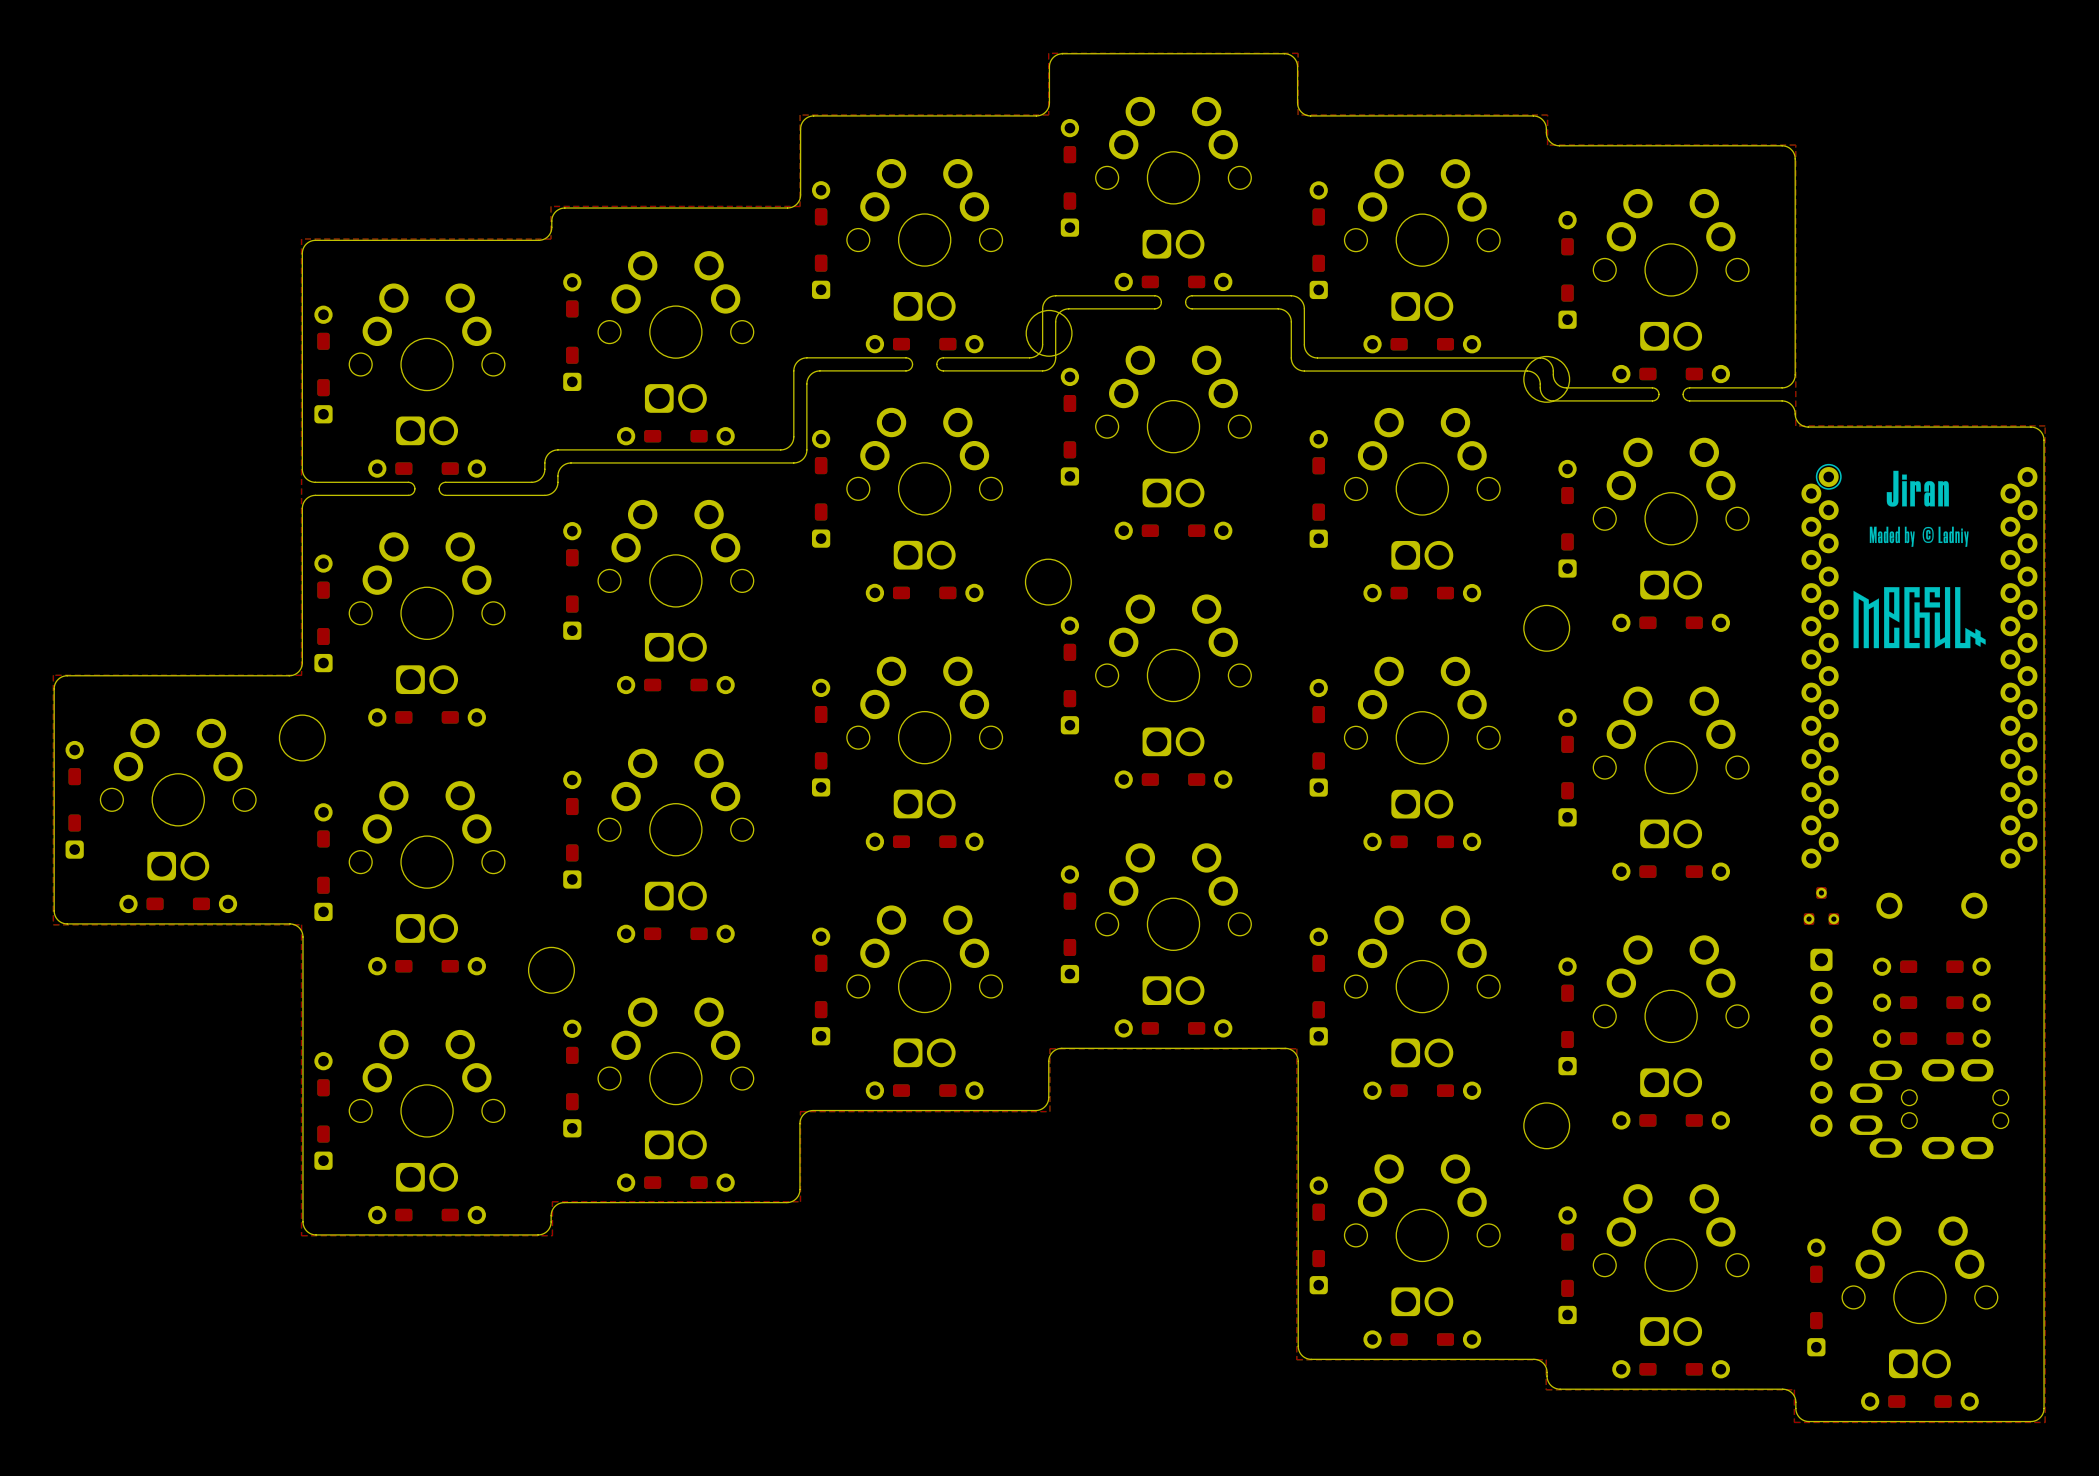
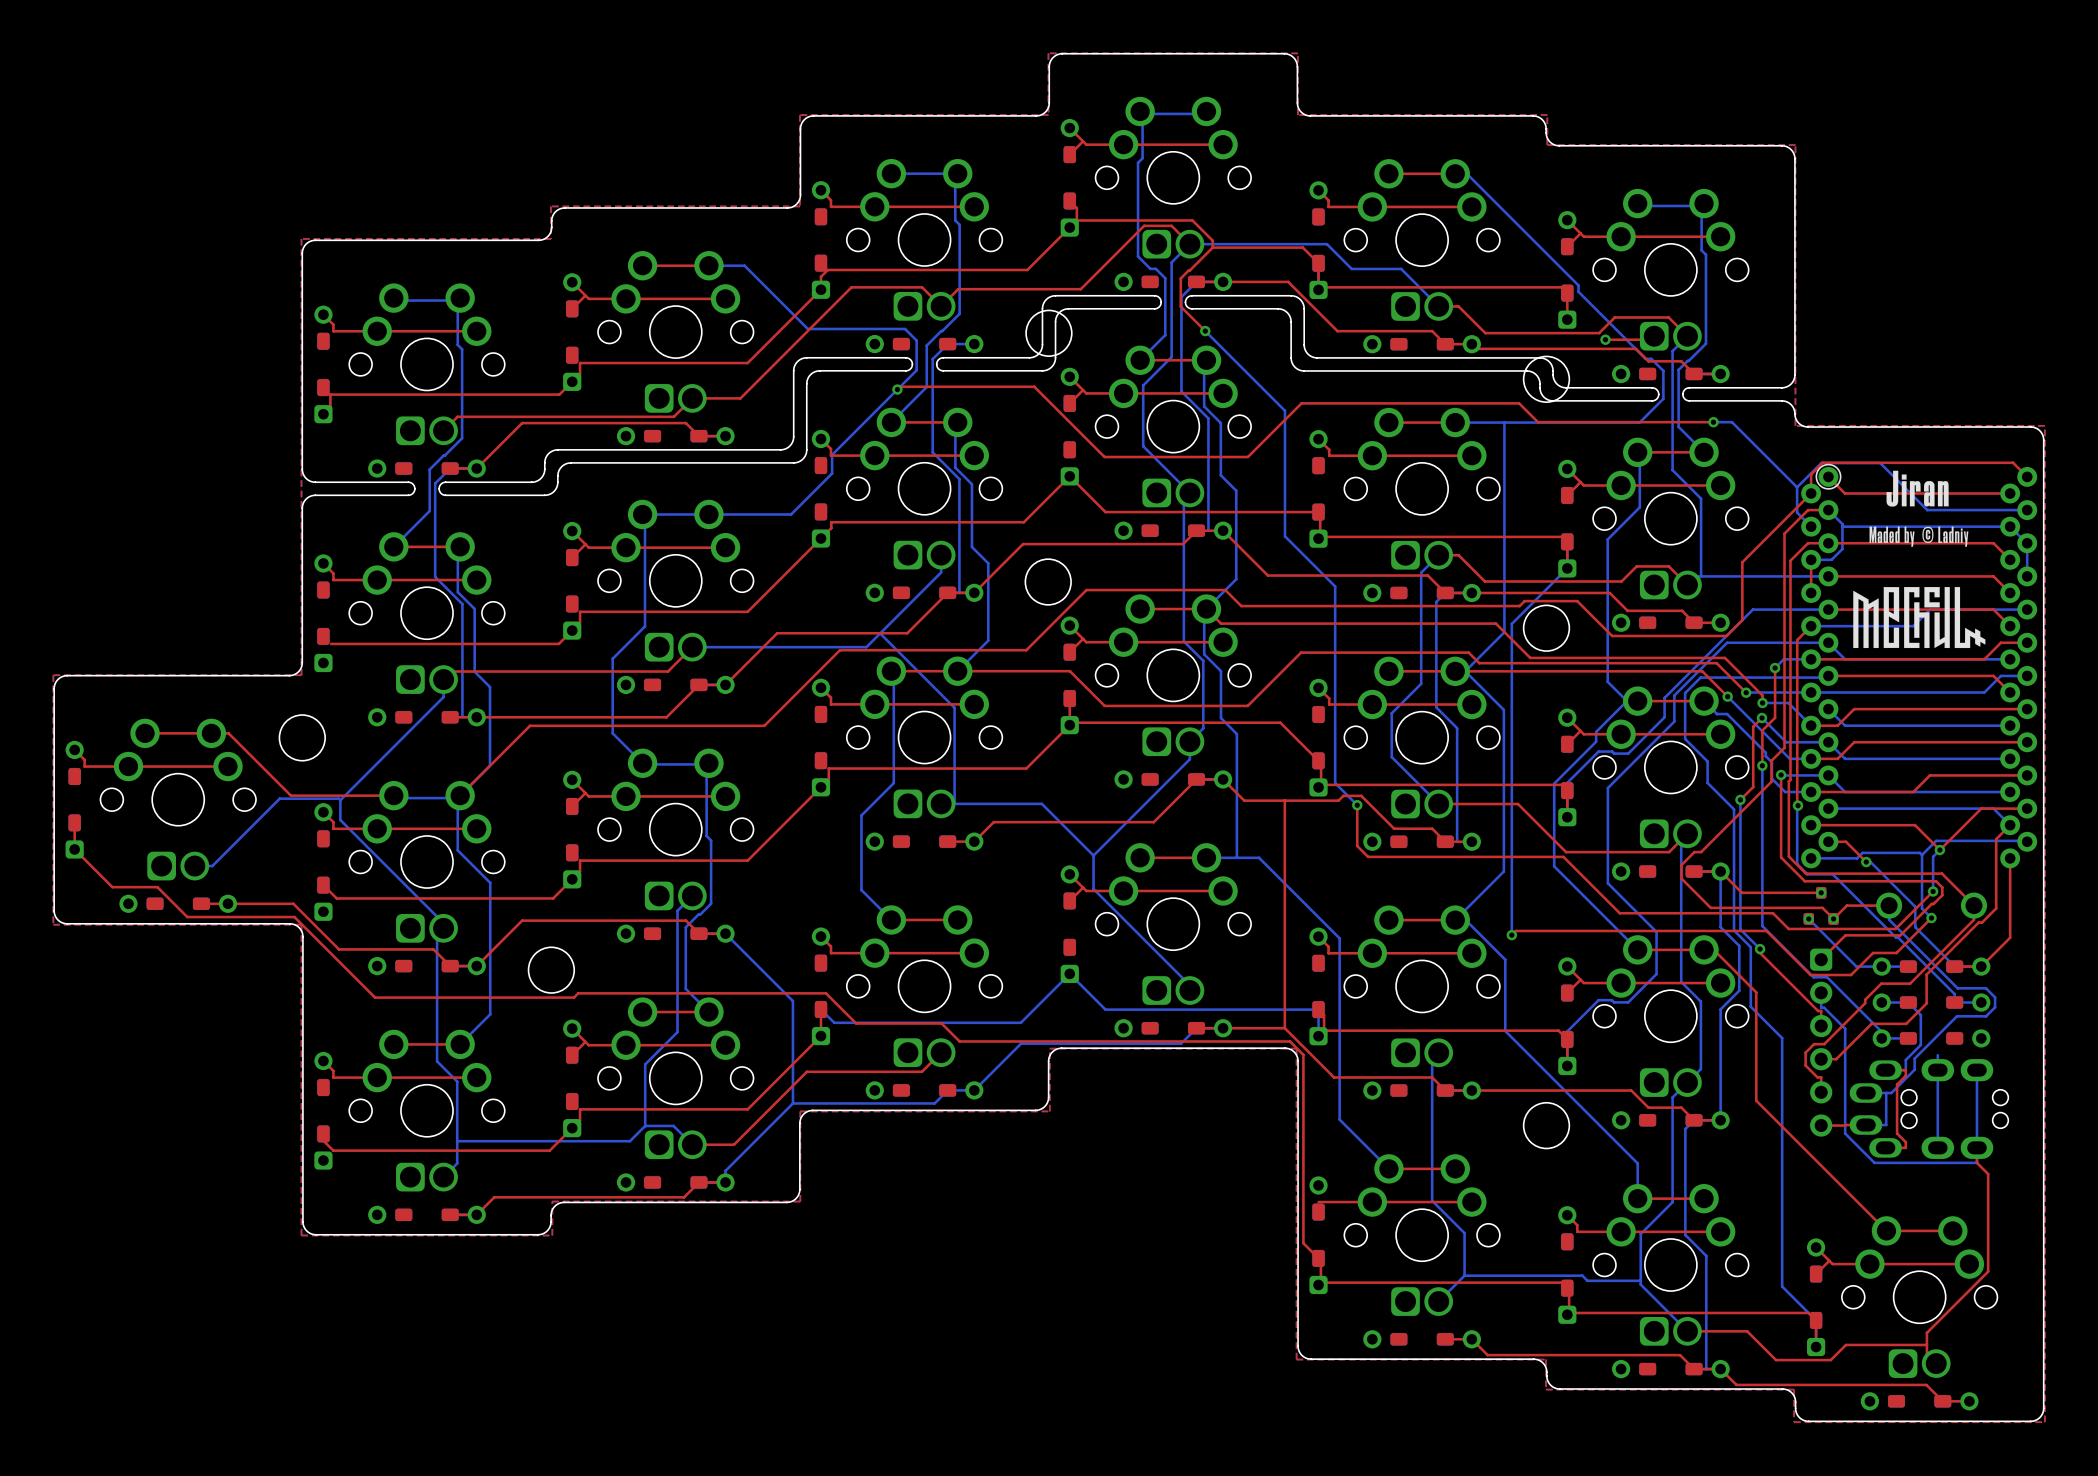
bottom track: none -> (1206, 111) (1204, 113) (1142, 113)
bottom track: none -> (1142, 113) (1142, 158) (1138, 162) (1138, 256) (1150, 268) (1155, 268) (1165, 278) (1165, 335) (1140, 360)
top track: none -> (1069, 128) (1086, 144) (1223, 144)
top track: none -> (1083, 141) (1069, 154)
bottom track: none -> (891, 173) (952, 173) (955, 176)
top track: none -> (1388, 173) (1455, 173)
bottom track: none -> (1455, 173) (1466, 173) (1578, 285) (1578, 291) (1645, 358) (1651, 358) (1663, 370) (1663, 398) (1639, 422) (1455, 422)
bottom track: none -> (955, 176) (955, 220) (959, 224) (959, 313) (926, 345) (926, 387) (891, 422)
top track: none -> (820, 190) (830, 200) (830, 206) (974, 206)
top track: none -> (1318, 190) (1328, 200) (1328, 206) (1471, 206)
top track: none -> (1069, 201) (1076, 208) (1076, 220)
bottom track: none -> (1637, 203) (1640, 205) (1701, 205)
bottom track: none -> (1701, 205) (1701, 250) (1705, 254) (1705, 343) (1678, 369) (1678, 426) (1704, 452)
top track: none -> (1076, 220) (1192, 220) (1212, 240) (1212, 247)
top track: none -> (1076, 220) (1027, 270) (827, 270) (820, 276) (820, 289) (747, 363) (580, 363) (580, 374) (559, 394) (330, 394) (330, 407) (323, 414)
top track: none -> (1567, 220) (1583, 236) (1720, 236)
top track: none -> (1580, 233) (1567, 246)
top track: none -> (1189, 244) (1171, 225) (1144, 225) (1080, 289) (958, 289) (941, 306) (922, 287) (851, 287) (740, 398) (692, 398) (673, 416) (457, 416) (443, 430)
top track: none -> (1212, 247) (1180, 278) (1180, 306) (1205, 331)
top track: none -> (1212, 247) (1302, 247) (1318, 263) (1318, 289)
top track: none -> (642, 265) (708, 265)
bottom track: none -> (708, 265) (744, 265) (807, 328) (905, 328) (916, 340) (916, 370) (832, 454) (832, 473) (791, 514) (647, 514) (645, 516)
top track: none -> (1196, 281) (1288, 281) (1337, 331) (1432, 331) (1445, 344) (1471, 344) (1476, 348) (1636, 348) (1648, 361) (1681, 361) (1694, 373) (1720, 373)
bottom track: none -> (1223, 281) (1196, 281) (1181, 296) (1181, 391) (1208, 418) (1208, 530)
top track: none -> (572, 282) (588, 298) (725, 298)
top track: none -> (1318, 287) (1561, 287) (1567, 293) (1567, 319)
top track: none -> (585, 295) (572, 308)
bottom track: none -> (393, 298) (396, 300) (457, 300)
bottom track: none -> (457, 300) (457, 344) (462, 349) (462, 438) (429, 469) (429, 510) (393, 546)
top track: none -> (1438, 306) (1458, 306) (1485, 333) (1599, 333) (1614, 317) (1668, 317) (1687, 336)
bottom track: none -> (1438, 306) (1401, 268) (1351, 268) (1326, 244) (1189, 244) (1171, 262) (1171, 357) (1143, 385) (1143, 446) (1189, 492) (1183, 499) (1183, 641) (1203, 660) (1203, 728) (1189, 741) (1189, 759) (1093, 855)
top track: none -> (323, 314) (333, 324) (333, 331) (476, 331)
bottom track: none -> (1205, 331) (1284, 410) (1284, 536) (1335, 586) (1335, 783) (1357, 805)
via: none -> (1205, 331)
top track: none -> (1654, 336) (1650, 339) (1605, 339)
bottom track: none -> (1687, 336) (1672, 351) (1672, 470) (1701, 498) (1701, 576)
via: none -> (1605, 339)
bottom track: none -> (974, 344) (947, 344) (932, 359) (932, 452) (959, 479) (959, 592)
top track: none -> (1140, 360) (1206, 360)
bottom track: none -> (1206, 360) (1204, 362) (1204, 406) (1220, 423) (1220, 475) (1236, 490) (1236, 579) (1204, 611) (1204, 654) (1221, 671) (1221, 718) (1236, 734) (1236, 857)
top track: none -> (1069, 376) (1086, 393) (1223, 393)
top track: none -> (897, 389) (900, 386) (1034, 386) (1104, 457) (1247, 457) (1301, 403) (1519, 403) (1537, 422) (1713, 422)
via: none -> (897, 389)
top track: none -> (1083, 390) (1069, 403)
top track: none -> (891, 422) (957, 422)
bottom track: none -> (957, 422) (955, 424) (955, 467) (971, 484) (971, 547) (988, 563) (988, 640) (957, 671)
top track: none -> (1388, 422) (1455, 422)
bottom track: none -> (1504, 422) (1504, 632) (1465, 671)
bottom track: none -> (1713, 422) (1731, 422) (1797, 487)
via: none -> (1713, 422)
top track: none -> (725, 436) (698, 436) (685, 423) (522, 423) (476, 468) (450, 468)
top track: none -> (820, 439) (830, 449) (830, 455) (974, 455)
top track: none -> (1318, 439) (1329, 449) (1329, 455) (1471, 455)
top track: none -> (1637, 452) (1704, 452)
bottom track: none -> (1637, 452) (1639, 454) (1639, 507) (1607, 539) (1607, 681) (1626, 701)
bottom track: none -> (476, 468) (450, 468) (435, 483) (435, 576) (462, 604) (462, 717)
top track: none -> (1567, 468) (1583, 485) (1720, 485)
top track: none -> (1828, 476) (1845, 493) (2010, 493)
top track: none -> (2027, 476) (2013, 462) (1822, 462) (1811, 474) (1811, 493) (1742, 562) (1742, 620) (1726, 635) (1612, 635) (1577, 601) (1524, 601) (1519, 606) (1241, 606) (1225, 590) (1086, 590) (1026, 650) (839, 650) (764, 725) (530, 725) (460, 795)
top track: none -> (1580, 482) (1567, 495)
bottom track: none -> (1797, 487) (1797, 512) (1811, 526)
bottom track: none -> (1797, 487) (1821, 463) (1880, 463) (1927, 510) (2027, 510)
top track: none -> (1828, 510) (1808, 510) (1784, 533) (1784, 747) (1771, 760) (1771, 781) (1701, 852) (1694, 852) (1681, 865) (1681, 878) (1710, 907) (1822, 907) (1833, 918) (1846, 905) (1889, 905)
bottom track: none -> (1828, 510) (1842, 524) (1842, 549) (1831, 559) (1811, 559)
bottom track: none -> (645, 516) (645, 626) (612, 658) (612, 733) (643, 764) (708, 763)
bottom track: none -> (1842, 526) (2010, 526) (2027, 543) (2027, 576)
top track: none -> (572, 531) (588, 547) (725, 547)
top track: none -> (1320, 536) (1562, 536) (1567, 541) (1567, 568)
top track: none -> (1320, 536) (1320, 513) (1318, 512) (1105, 512) (1069, 476) (1023, 522) (831, 522) (831, 528) (747, 611) (580, 611) (580, 622) (558, 643) (330, 643)
bottom track: none -> (1567, 541) (1567, 568) (1511, 623) (1511, 935)
top track: none -> (585, 544) (572, 557)
top track: none -> (393, 546) (460, 546)
bottom track: none -> (460, 546) (457, 549) (457, 592) (474, 608) (474, 671) (490, 687) (490, 765) (457, 798)
bottom track: none -> (941, 555) (941, 572) (866, 647) (692, 647)
top track: none -> (1438, 555) (1458, 555) (1484, 581) (1621, 581) (1636, 566) (1668, 566) (1687, 585)
bottom track: none -> (1438, 555) (1421, 572) (1421, 683) (1391, 713) (1391, 757) (1438, 804)
top track: none -> (1811, 559) (1811, 593)
top track: none -> (2010, 559) (1993, 543) (1807, 543) (1790, 560) (1788, 856) (1805, 873) (1941, 873) (1973, 905) (1973, 919) (1910, 983) (1881, 983) (1865, 999) (1865, 1003) (1824, 1044) (1814, 1044) (1805, 1052) (1805, 1065) (1817, 1077) (1821, 1077) (1821, 1092)
top track: none -> (323, 563) (333, 573) (333, 580) (476, 580)
top track: none -> (1828, 576) (1993, 576) (2010, 593)
bottom track: none -> (1828, 576) (1696, 576) (1687, 585)
bottom track: none -> (1471, 592) (1445, 592) (1436, 601) (1436, 707) (1457, 728) (1457, 841)
top track: none -> (1140, 609) (1206, 609) (1221, 623) (1495, 623) (1530, 657) (1724, 657) (1762, 695) (1762, 702)
top track: none -> (1828, 609) (1993, 609) (2010, 626)
bottom track: none -> (1828, 609) (1752, 609) (1664, 697) (1664, 717) (1628, 753) (1598, 751) (1567, 782) (1567, 817)
bottom track: none -> (2027, 609) (1929, 609) (1913, 626) (1811, 626)
top track: none -> (1720, 622) (1694, 622) (1682, 610) (1627, 610) (1609, 592) (1445, 592) (1427, 575) (1267, 575) (1223, 530) (1196, 530) (1183, 544) (1023, 544) (974, 592) (947, 592) (907, 633) (777, 633) (725, 684) (698, 684) (666, 717) (450, 717)
top track: none -> (1069, 625) (1086, 642) (1223, 642)
top track: none -> (1811, 626) (1797, 640) (1798, 805)
bottom track: none -> (880, 633) (954, 707) (954, 803)
top track: none -> (1083, 638) (1069, 652)
top track: none -> (2027, 642) (2000, 642) (1984, 659) (1811, 659)
top track: none -> (692, 647) (668, 671) (451, 671) (443, 679)
bottom track: none -> (1811, 659) (1783, 659) (1775, 668)
bottom track: none -> (2010, 659) (1845, 659) (1828, 642) (1727, 642) (1674, 695) (1674, 721) (1607, 788) (1607, 883) (1656, 931) (1656, 974) (1628, 1002) (1598, 1000) (1567, 1031) (1567, 1065)
top track: none -> (1775, 668) (1775, 717) (1762, 730) (1762, 765)
via: none -> (1775, 668)
top track: none -> (891, 671) (1069, 671) (1104, 705) (1247, 705) (1301, 652) (1468, 652) (1479, 663) (1716, 663) (1746, 692)
bottom track: none -> (891, 671) (893, 673) (893, 783) (861, 815) (861, 890) (891, 919)
top track: none -> (1388, 671) (1702, 671) (1727, 696)
bottom track: none -> (1465, 671) (1503, 709) (1503, 871) (1455, 920)
top track: none -> (1828, 675) (1993, 675) (2010, 692)
bottom track: none -> (1828, 675) (1826, 677) (1700, 677) (1685, 693) (1685, 739) (1707, 761) (1707, 782) (1734, 809) (1734, 930) (1750, 947) (1750, 1006) (1782, 1038) (1782, 1286) (1816, 1320) (1816, 1347)
bottom track: none -> (2027, 675) (2000, 675) (1984, 692) (1746, 692)
bottom track: none -> (443, 679) (443, 697) (340, 800)
top track: none -> (820, 687) (830, 697) (830, 704) (974, 704)
top track: none -> (1318, 687) (1329, 698) (1329, 704) (1471, 704)
via: none -> (1746, 692)
bottom track: none -> (1727, 696) (1789, 758) (1811, 758)
via: none -> (1727, 696)
top track: none -> (1069, 698) (1069, 725) (1026, 768) (828, 768) (828, 779) (747, 860) (580, 860) (580, 871) (553, 898) (336, 898) (323, 885)
bottom track: none -> (1626, 701) (1596, 731) (1596, 741) (1554, 783) (1554, 866) (1637, 949)
top track: none -> (1637, 701) (1704, 701)
bottom track: none -> (1704, 701) (1716, 714) (1727, 714) (1765, 752) (1765, 756) (1771, 762) (1771, 778) (1785, 792) (1811, 792)
bottom track: none -> (1762, 702) (1788, 702) (1811, 725)
via: none -> (1762, 702)
bottom track: none -> (1828, 709) (1845, 725) (2010, 725)
top track: none -> (2027, 709) (1854, 709) (1837, 725) (1811, 725)
top track: none -> (1567, 717) (1583, 734) (1720, 734)
top track: none -> (1761, 718) (1753, 726) (1753, 787) (1740, 799)
bottom track: none -> (1761, 718) (1786, 742) (1828, 742) (1845, 758) (2010, 758)
via: none -> (1761, 718)
top track: none -> (1069, 722) (1280, 722) (1321, 763) (1321, 784)
top track: none -> (1580, 730) (1567, 744)
top track: none -> (145, 733) (228, 733) (290, 795) (393, 795)
top track: none -> (2027, 742) (1854, 742) (1837, 758) (1811, 758)
top track: none -> (74, 749) (84, 759) (84, 766) (227, 766)
bottom track: none -> (706, 764) (706, 836) (711, 840) (711, 903) (685, 927) (685, 988) (708, 1012)
bottom track: none -> (1762, 765) (1762, 926) (1813, 977) (1827, 977) (1881, 1031) (1881, 1038) (1908, 1038)
via: none -> (1762, 765)
top track: none -> (1781, 775) (1781, 857) (1804, 881) (1936, 881) (1942, 887) (1942, 895) (1900, 935) (1845, 935) (1821, 959)
bottom track: none -> (1781, 775) (1828, 775) (1845, 792) (2010, 792)
via: none -> (1781, 775)
top track: none -> (2027, 775) (1929, 775) (1913, 792) (1811, 792)
top track: none -> (572, 779) (588, 796) (725, 796)
top track: none -> (1321, 784) (1561, 784) (1567, 790) (1567, 817)
top track: none -> (585, 793) (572, 806)
bottom track: none -> (393, 795) (396, 798) (457, 798)
bottom track: none -> (457, 798) (457, 850) (490, 882) (490, 1014) (460, 1044)
bottom track: none -> (1740, 799) (1740, 929) (1760, 949)
via: none -> (1740, 799)
bottom track: none -> (340, 800) (338, 798) (279, 798) (212, 866) (194, 866)
bottom track: none -> (340, 800) (340, 820) (443, 923) (443, 928) (437, 934) (437, 1061) (457, 1081) (457, 1163) (443, 1177)
top track: none -> (1284, 800) (1284, 1028)
bottom track: none -> (941, 803) (1041, 803) (1093, 855)
top track: none -> (1438, 804) (1517, 804) (1566, 852) (1669, 852) (1687, 833)
top track: none -> (1357, 805) (1357, 846) (1368, 856) (1563, 856) (1619, 913) (1773, 913) (1788, 928) (1895, 928) (1933, 891)
via: none -> (1357, 805)
bottom track: none -> (1798, 805) (1797, 864) (1807, 874) (1832, 874) (1954, 994) (1954, 1002) (1981, 1002)
via: none -> (1798, 805)
bottom track: none -> (1828, 808) (1993, 808) (2010, 825)
top track: none -> (2027, 808) (1981, 808) (1939, 850) (1915, 825) (1811, 825)
top track: none -> (323, 812) (333, 822) (333, 828) (476, 828)
top track: none -> (74, 822) (74, 849) (112, 887) (157, 887) (187, 917) (294, 917) (375, 997) (574, 997) (578, 993) (826, 993) (856, 1023) (941, 1023) (959, 1041) (1290, 1041) (1303, 1054) (1303, 1243) (1320, 1260) (1320, 1282)
top track: none -> (2010, 825) (1996, 839) (1996, 908) (1982, 922) (1978, 922) (1926, 974) (1926, 1003) (1906, 1023) (1871, 1023) (1836, 1059) (1821, 1059)
bottom track: none -> (1687, 833) (1681, 840) (1681, 981) (1700, 1001) (1700, 1069) (1672, 1097) (1672, 1202) (1640, 1234) (1640, 1284) (1687, 1331)
top track: none -> (947, 841) (974, 841) (993, 822) (1153, 822) (1196, 779) (1223, 779) (1244, 800) (1338, 800) (1343, 795) (1361, 795) (1394, 828) (1432, 828) (1445, 841) (1471, 841)
top track: none -> (1828, 841) (1846, 841) (1866, 862)
bottom track: none -> (2027, 841) (1936, 840) (1922, 854)
bottom track: none -> (1939, 850) (1933, 856) (1933, 891)
via: none -> (1939, 850)
bottom track: none -> (1093, 855) (1093, 889) (1189, 985) (1189, 990)
bottom track: none -> (1922, 854) (1922, 908) (1931, 918)
bottom track: none -> (1922, 854) (1919, 852) (1862, 852) (1857, 858) (1811, 858)
top track: none -> (1140, 857) (1206, 857)
bottom track: none -> (1206, 857) (1259, 857) (1339, 938) (1339, 1119) (1388, 1168)
top track: none -> (2010, 858) (2010, 937) (1981, 966) (1954, 966)
bottom track: none -> (1866, 862) (1870, 862) (1915, 906) (1915, 927) (1954, 966) (1981, 966)
via: none -> (1866, 862)
top track: none -> (1694, 871) (1720, 871) (1741, 892) (1821, 892)
bottom track: none -> (1694, 871) (1720, 871) (1720, 927) (1739, 945) (1739, 990) (1720, 1009) (1720, 1120) (1694, 1120) (1685, 1129) (1685, 1234) (1706, 1255) (1706, 1369)
top track: none -> (1069, 874) (1086, 890) (1223, 890)
top track: none -> (1083, 887) (1069, 900)
via: none -> (1933, 891)
bottom track: none -> (692, 895) (677, 910) (677, 1032) (645, 1064) (645, 1125)
top track: none -> (201, 903) (293, 903) (339, 949) (433, 949) (450, 966) (476, 966) (522, 920) (685, 920) (698, 933) (725, 933)
bottom track: none -> (1889, 905) (1889, 919) (1957, 988) (1986, 988) (1995, 997) (1995, 1007) (1986, 1016) (1956, 1016) (1914, 1058) (1914, 1069) (1891, 1093) (1865, 1093)
bottom track: none -> (1460, 914) (1505, 959) (1505, 1031) (1637, 1163) (1637, 1198)
top track: none -> (1931, 918) (1896, 952) (1873, 952) (1851, 975) (1810, 975) (1766, 930) (1515, 930) (1511, 935)
via: none -> (1931, 918)
bottom track: none -> (1808, 918) (1856, 966) (1908, 966)
top track: none -> (891, 919) (957, 919)
top track: none -> (1388, 920) (1455, 920)
bottom track: none -> (698, 933) (725, 933) (792, 1001) (792, 1103)
via: none -> (1511, 935)
top track: none -> (820, 936) (830, 946) (830, 953) (974, 953)
top track: none -> (1318, 936) (1328, 946) (1328, 953) (1471, 953)
top track: none -> (1760, 949) (1760, 953) (1818, 1011) (1821, 1011) (1821, 1026)
via: none -> (1760, 949)
top track: none -> (1637, 949) (1713, 949) (1756, 992) (1756, 1100) (1886, 1230) (1952, 1230)
top track: none -> (1567, 966) (1583, 983) (1720, 983)
top track: none -> (1580, 979) (1567, 993)
bottom track: none -> (1821, 992) (1821, 1007) (1824, 1007) (1845, 1028) (1845, 1133) (1874, 1162) (1976, 1162) (1976, 1070)
bottom track: none -> (1881, 1002) (1908, 1002) (1920, 1014) (1920, 1045) (1905, 1060) (1905, 1070) (1885, 1070)
top track: none -> (820, 1009) (820, 1036) (747, 1109) (580, 1109) (580, 1120) (549, 1150) (333, 1150) (323, 1140) (323, 1133)
bottom track: none -> (820, 1009) (834, 1022) (1020, 1022) (1069, 973) (1105, 1009) (1318, 1009) (1318, 1036)
top track: none -> (1318, 1009) (1324, 1015) (1324, 1030)
top track: none -> (642, 1012) (708, 1012)
top track: none -> (572, 1028) (588, 1045) (725, 1045)
top track: none -> (1196, 1028) (1284, 1028)
bottom track: none -> (1223, 1028) (1196, 1028) (1181, 1043) (1021, 1043) (974, 1090) (947, 1090) (934, 1103) (792, 1103)
top track: none -> (1284, 1028) (1334, 1077) (1432, 1077) (1445, 1090) (1631, 1090) (1648, 1107) (1681, 1107) (1694, 1120) (1720, 1120)
top track: none -> (1324, 1030) (1558, 1030) (1567, 1039) (1567, 1065)
top track: none -> (585, 1041) (572, 1055)
top track: none -> (393, 1044) (460, 1044)
top track: none -> (941, 1052) (921, 1071) (806, 1071) (733, 1144) (692, 1144)
bottom track: none -> (1438, 1052) (1432, 1059) (1432, 1200) (1464, 1233) (1464, 1275)
bottom track: none -> (1937, 1055) (1937, 1147)
top track: none -> (323, 1061) (333, 1071) (333, 1077) (476, 1077)
top track: none -> (1885, 1070) (1905, 1070) (1905, 1075) (1897, 1084) (1897, 1133) (1905, 1142) (1905, 1147) (1885, 1147)
bottom track: none -> (1886, 1093) (1886, 1125) (1865, 1125)
bottom track: none -> (792, 1103) (725, 1170) (725, 1182) (698, 1182)
top track: none -> (1865, 1125) (1821, 1125)
bottom track: none -> (645, 1125) (673, 1125) (692, 1144)
bottom track: none -> (645, 1125) (629, 1141) (457, 1141)
top track: none -> (1976, 1147) (1976, 1162) (1988, 1174) (1988, 1271) (1926, 1332) (1926, 1354) (1936, 1363)
top track: none -> (1388, 1168) (1455, 1168)
top track: none -> (725, 1182) (698, 1182) (684, 1197) (494, 1197) (476, 1214) (450, 1214)
top track: none -> (1637, 1198) (1704, 1198)
top track: none -> (1318, 1202) (1471, 1202)
top track: none -> (1567, 1215) (1577, 1225) (1577, 1231) (1720, 1231)
top track: none -> (1816, 1247) (1832, 1264) (1969, 1264)
top track: none -> (1829, 1260) (1816, 1274)
bottom track: none -> (1464, 1275) (1438, 1301)
bottom track: none -> (1464, 1275) (1582, 1275) (1587, 1280) (1640, 1280)
top track: none -> (1320, 1282) (1561, 1282) (1569, 1289) (1569, 1312)
top track: none -> (1569, 1312) (1808, 1312) (1816, 1320) (1816, 1347)
top track: none -> (1687, 1331) (1747, 1331) (1776, 1360) (1830, 1360) (1845, 1344) (1926, 1344)
top track: none -> (1445, 1339) (1471, 1339) (1487, 1355) (1680, 1355) (1694, 1369) (1720, 1369) (1736, 1384) (1926, 1384) (1942, 1401) (1969, 1401)

